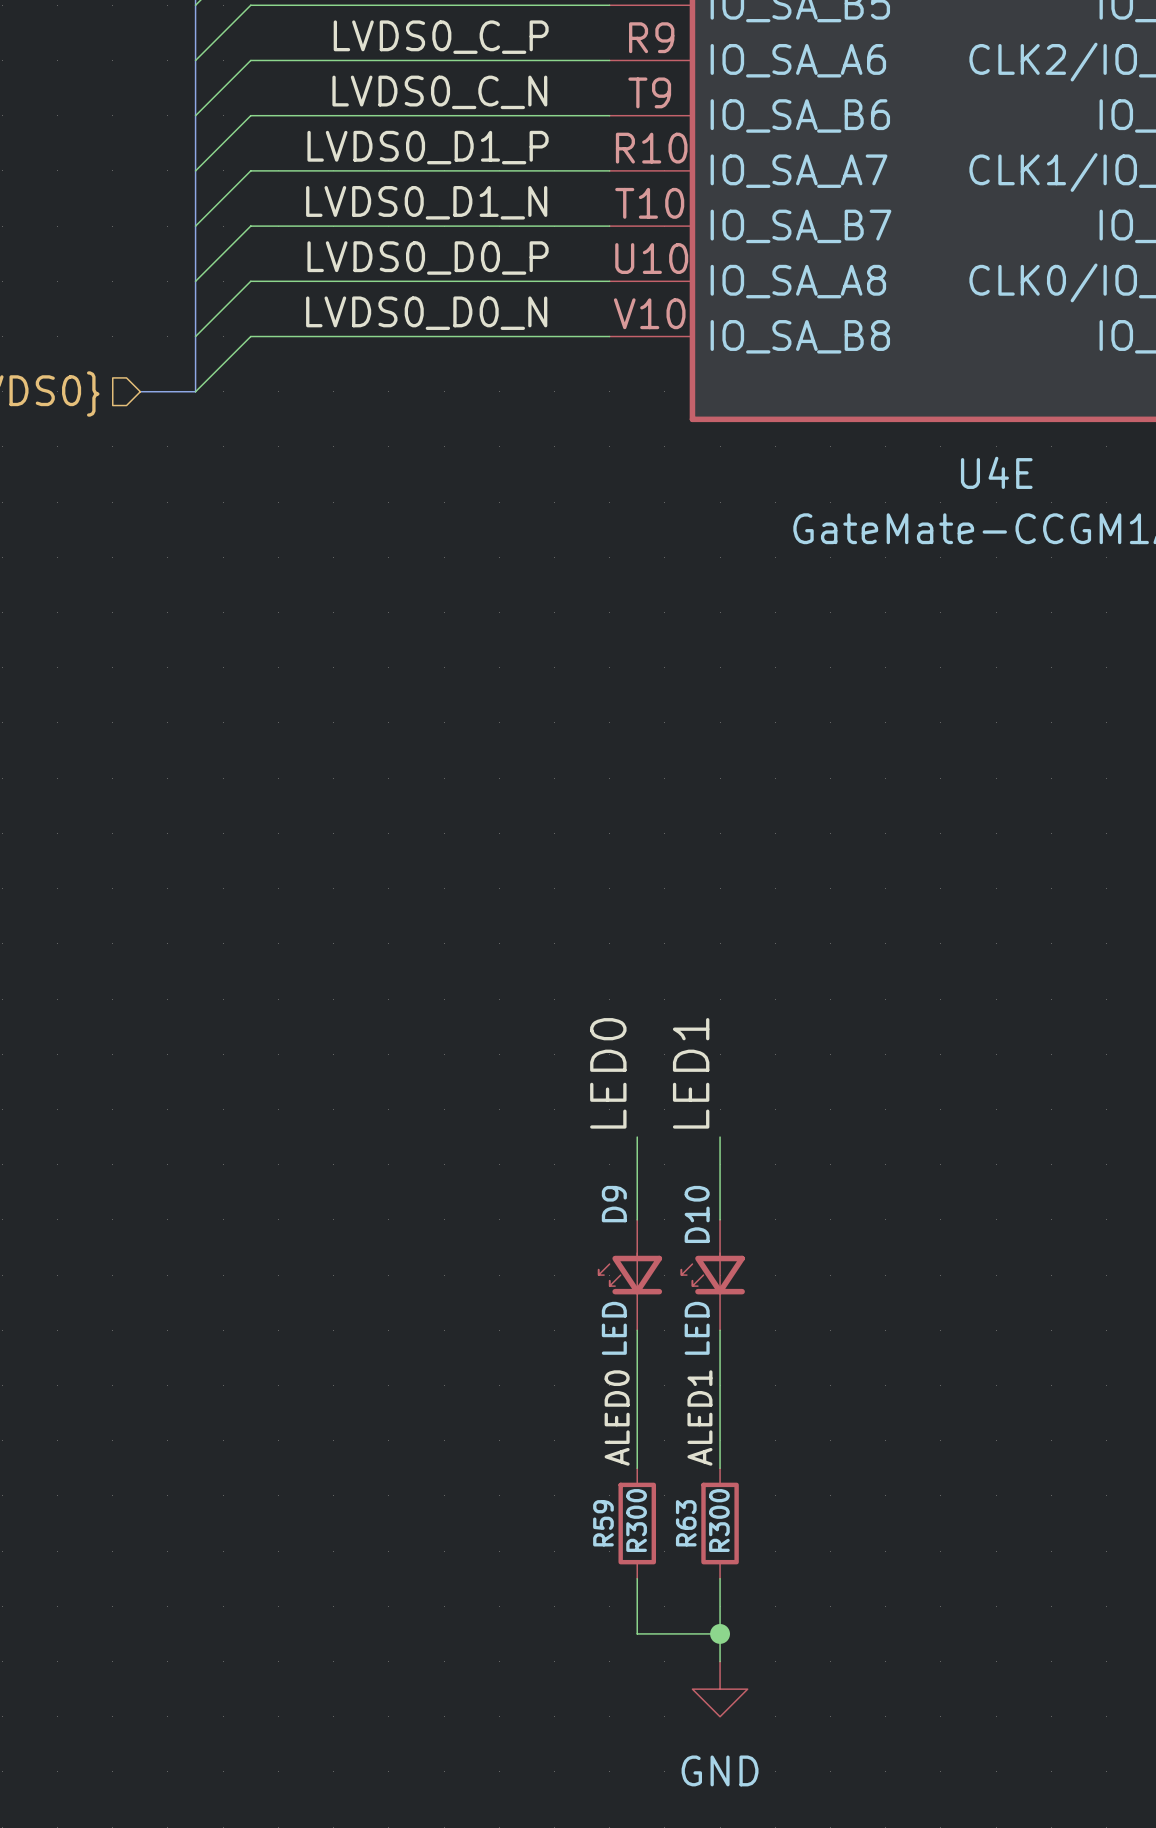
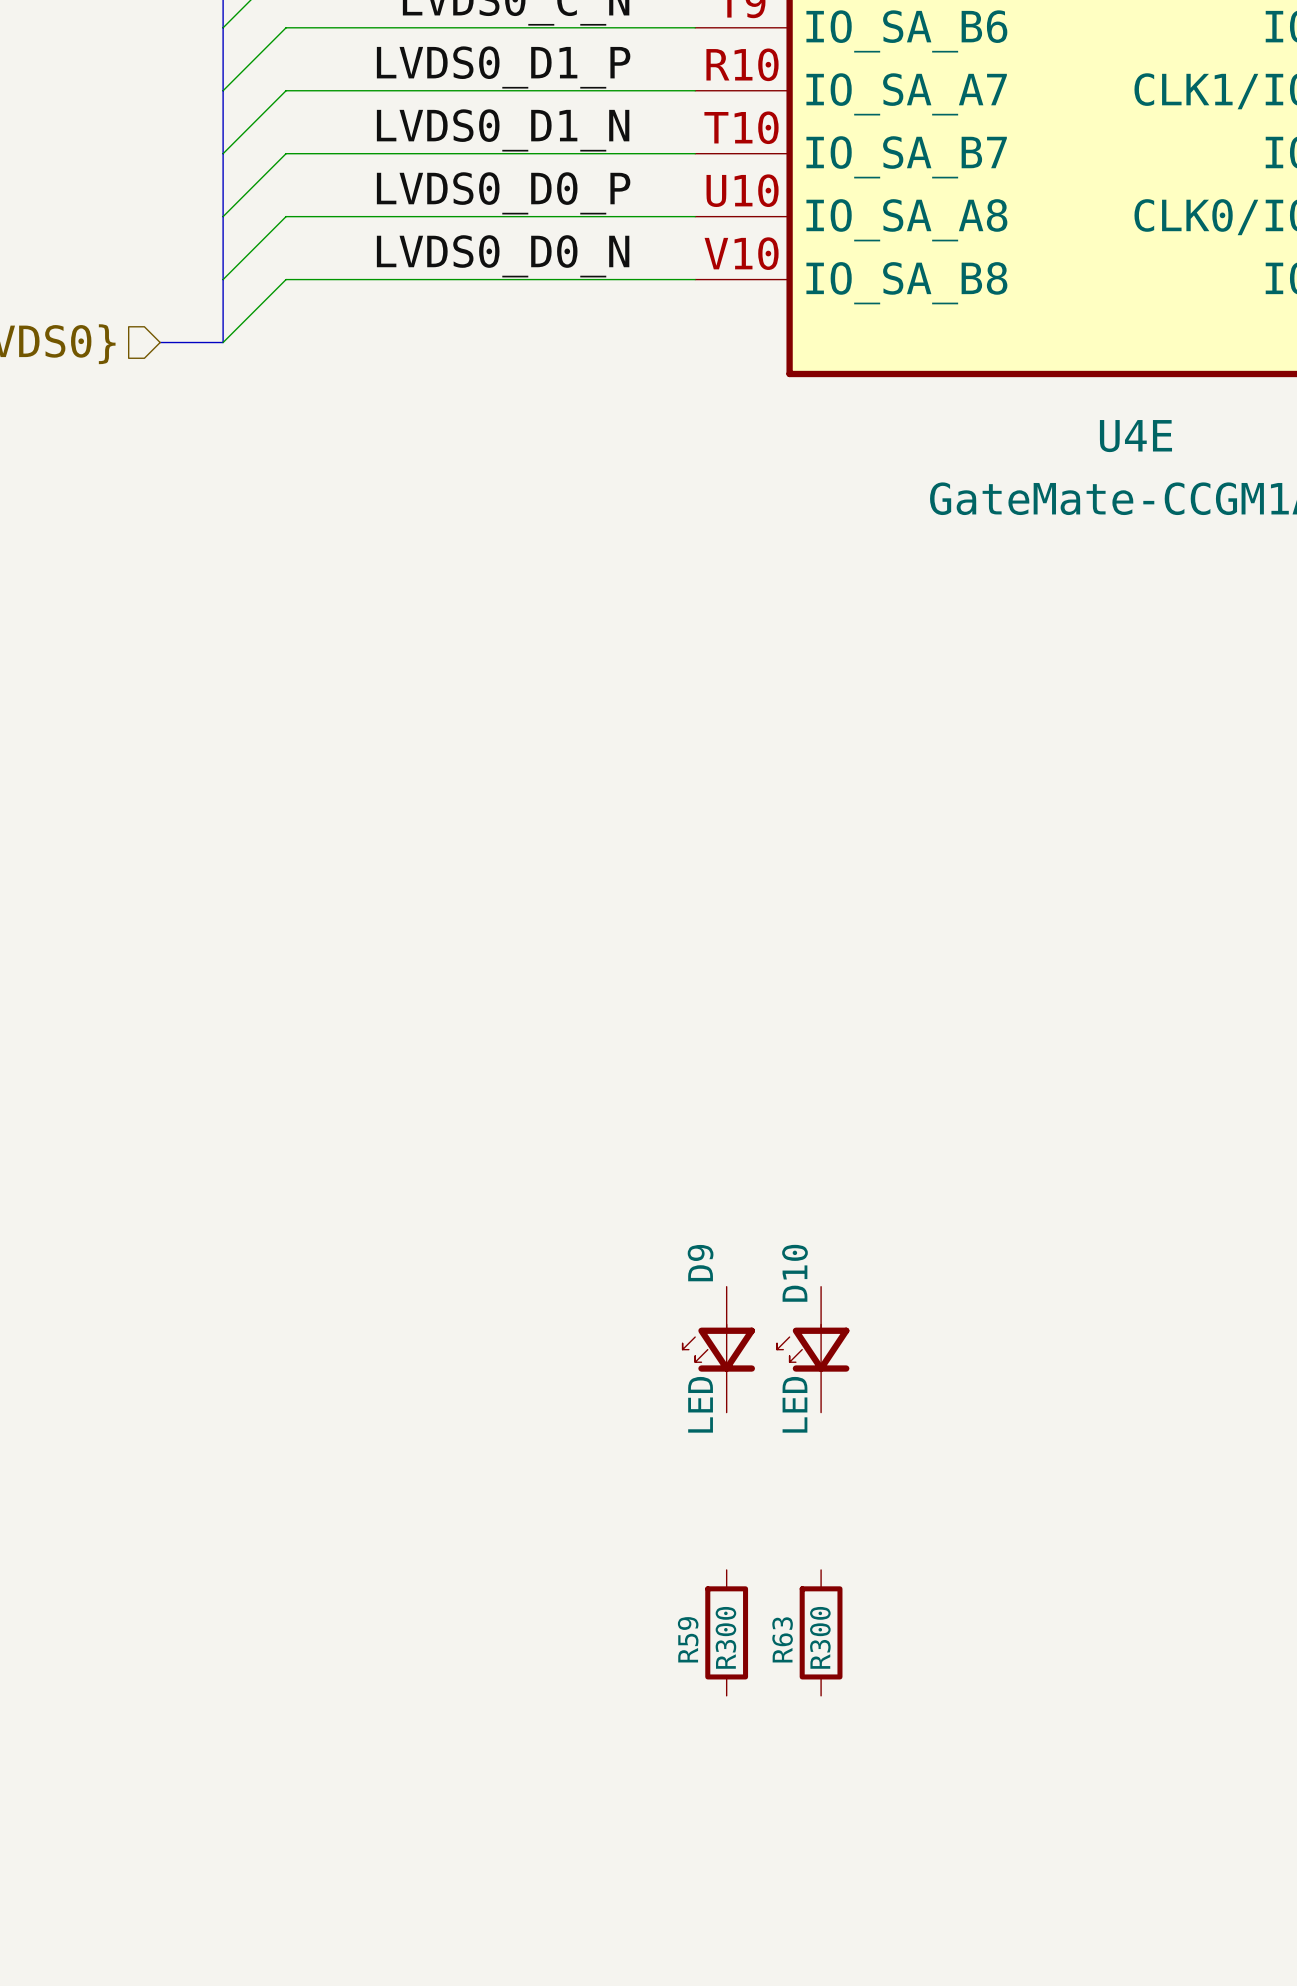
label: LED0 (608, 1073) -> none
label: LED1 (691, 1073) -> none
wire: (637, 1137) (637, 1219) -> none
wire: (720, 1137) (720, 1219) -> none
wire: (637, 1330) (637, 1468) -> none
wire: (720, 1330) (720, 1468) -> none
label: ALED0 (617, 1418) -> none
label: ALED1 (699, 1418) -> none
wire: (637, 1578) (637, 1633) (720, 1633) -> none
wire: (720, 1578) (720, 1661) -> none
junction: (720, 1633) -> none
power symbol: GND (720, 1689) -> none

